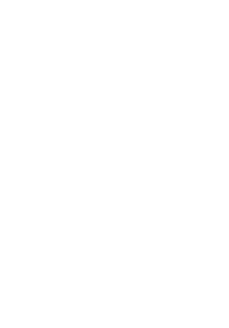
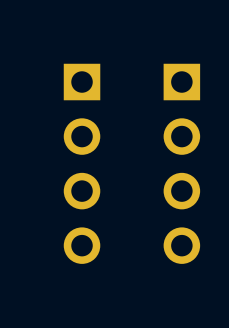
part: none -> (82, 163)
part: none -> (181, 163)

